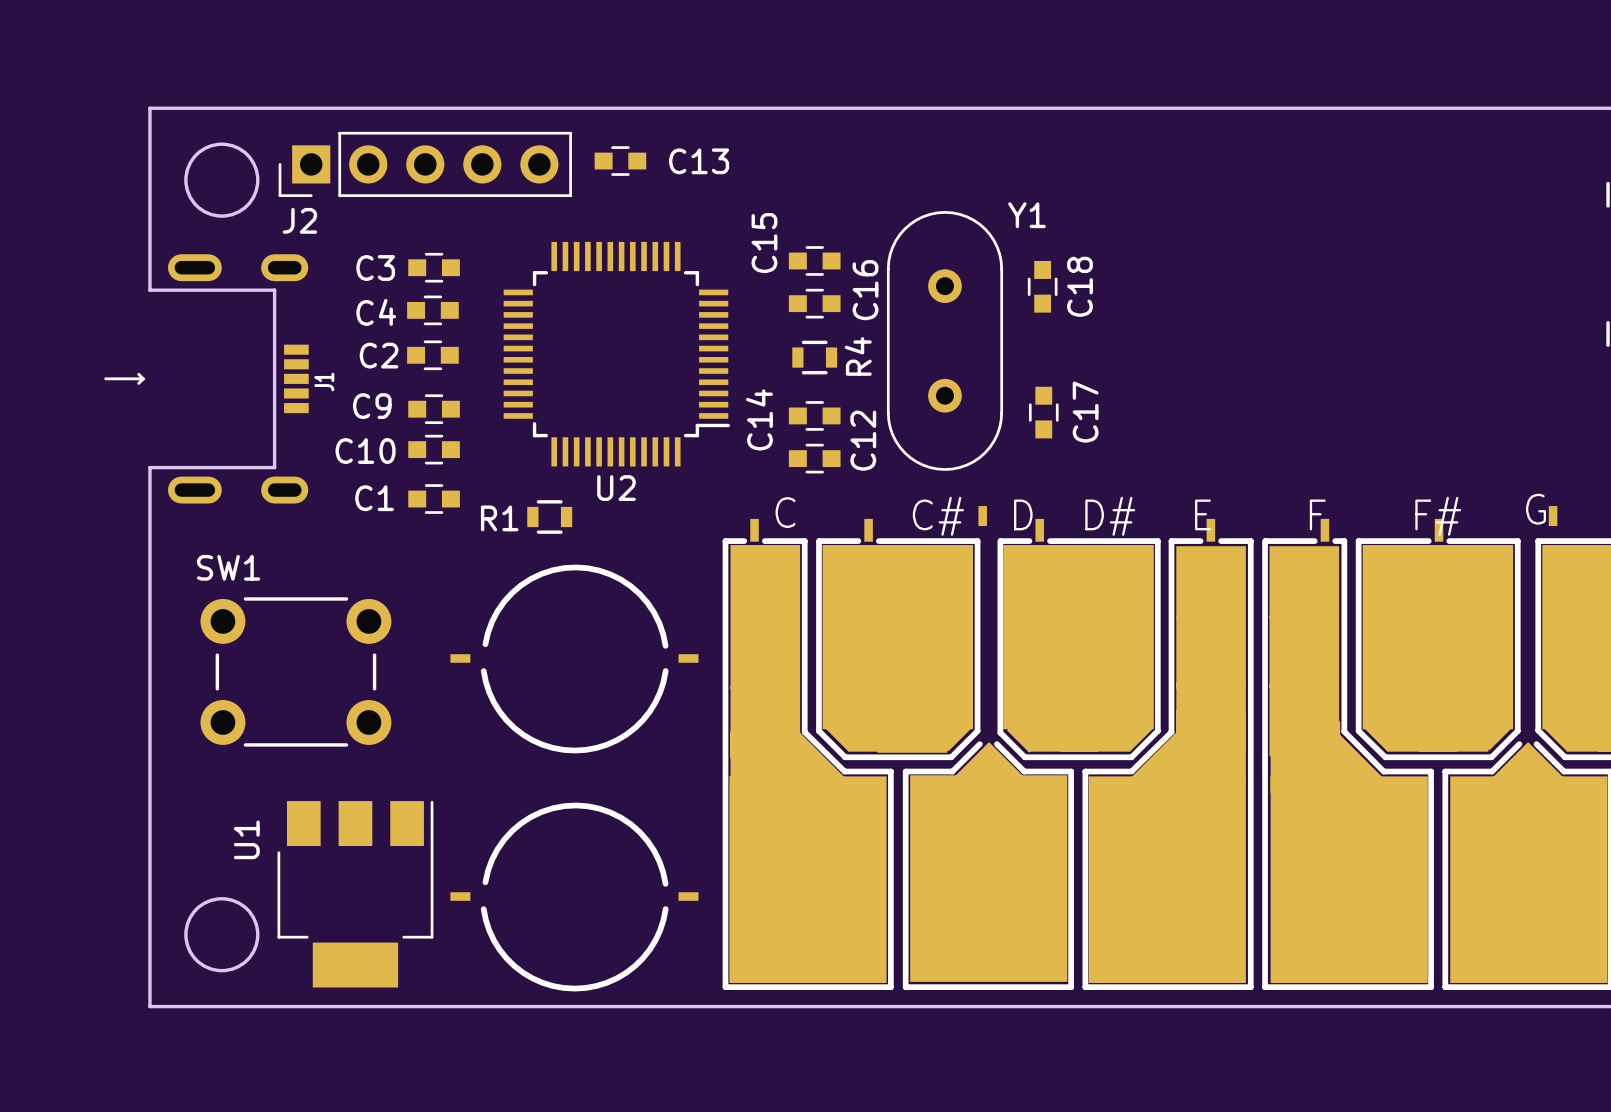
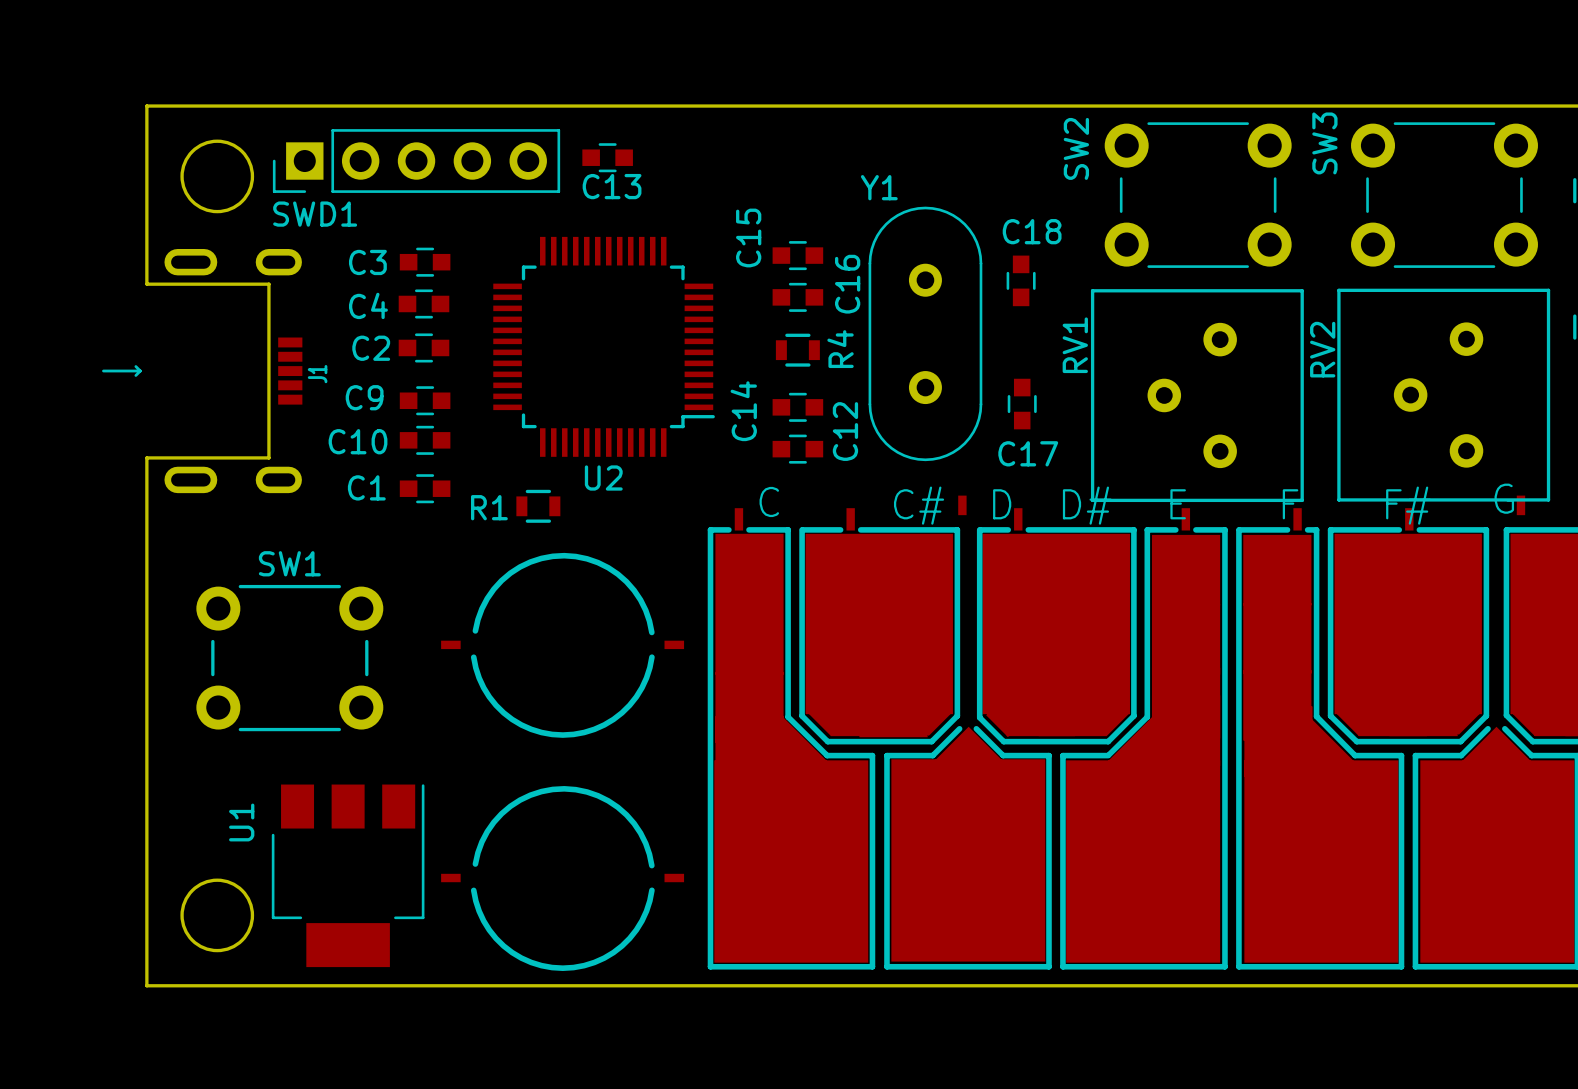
C13 name position: C13 (699, 161) -> C13 (612, 186)
SW2: none -> (1198, 195)
SW3: none -> (1444, 195)
Y1 name position: Y1 (1026, 215) -> Y1 (879, 187)
J2 name: J2 (299, 220) -> SWD1 (315, 214)
C18 name rotation: 0° (1080, 286) -> 90° clockwise (1032, 231)
RV1: none -> (1197, 395)
RV2: none -> (1443, 395)
C17 name rotation: 0° (1085, 412) -> 90° clockwise (1028, 453)
SW1 name position: SW1 (228, 567) -> SW1 (289, 563)

